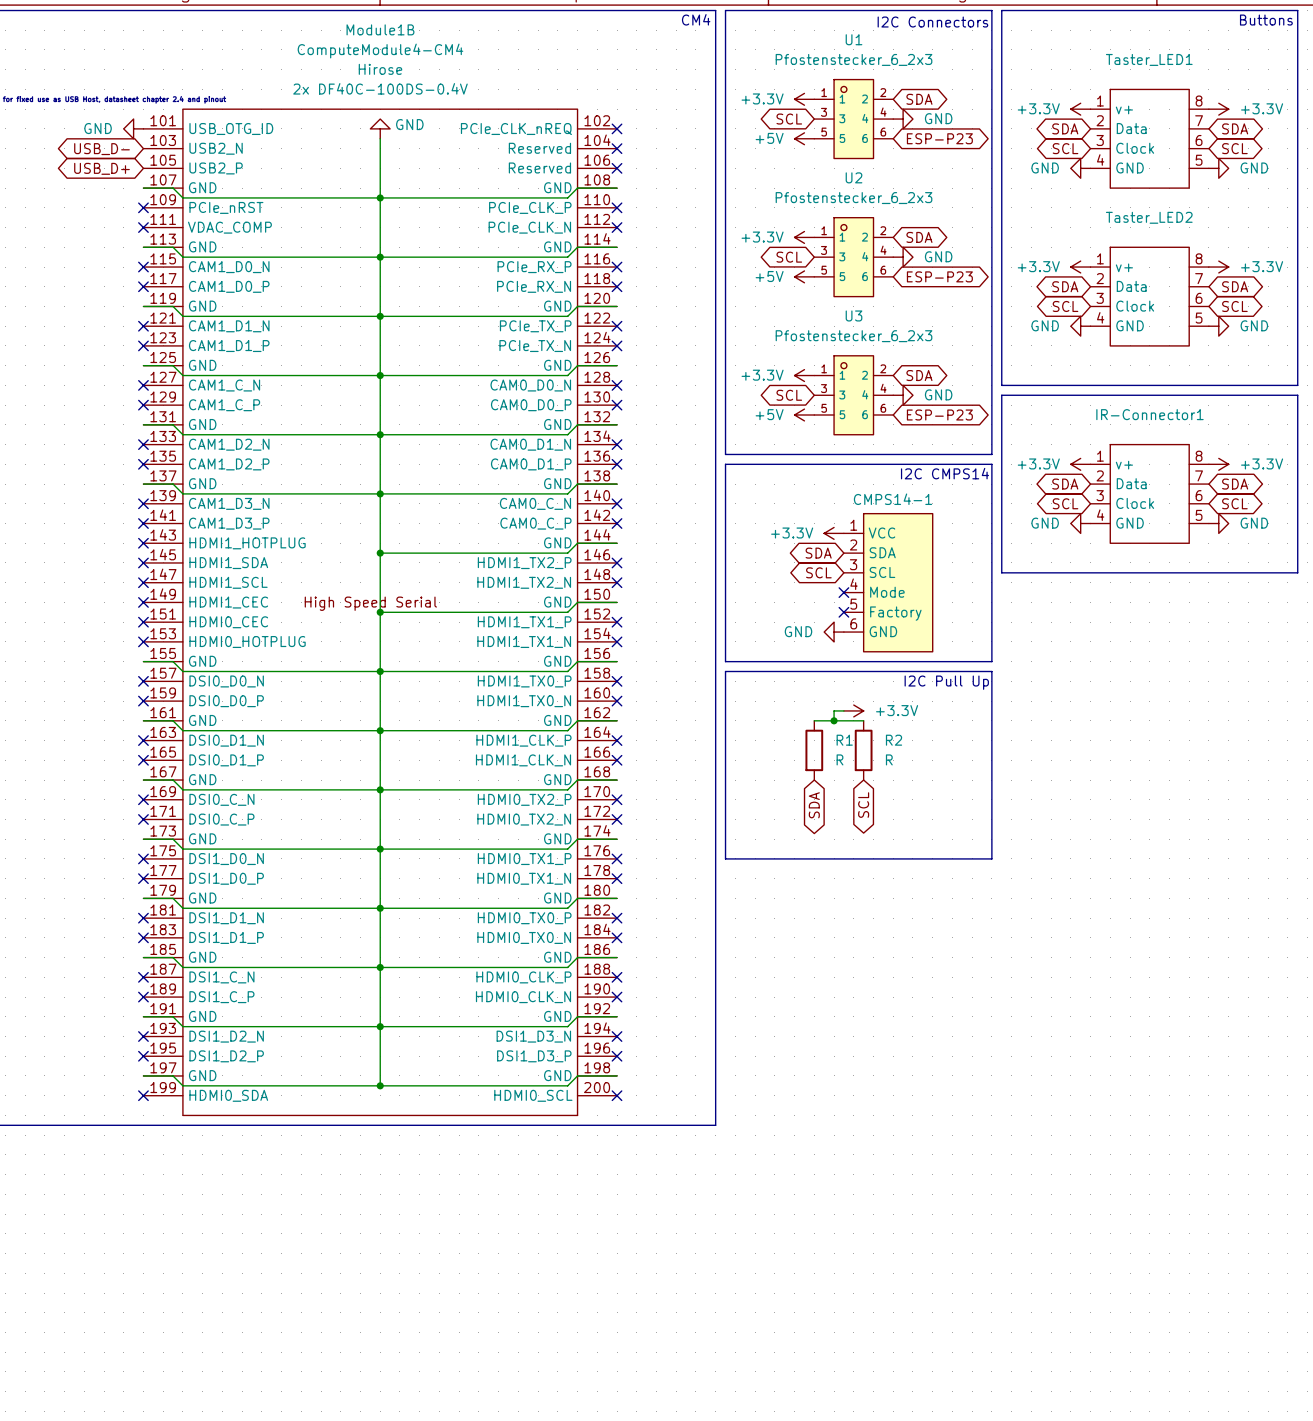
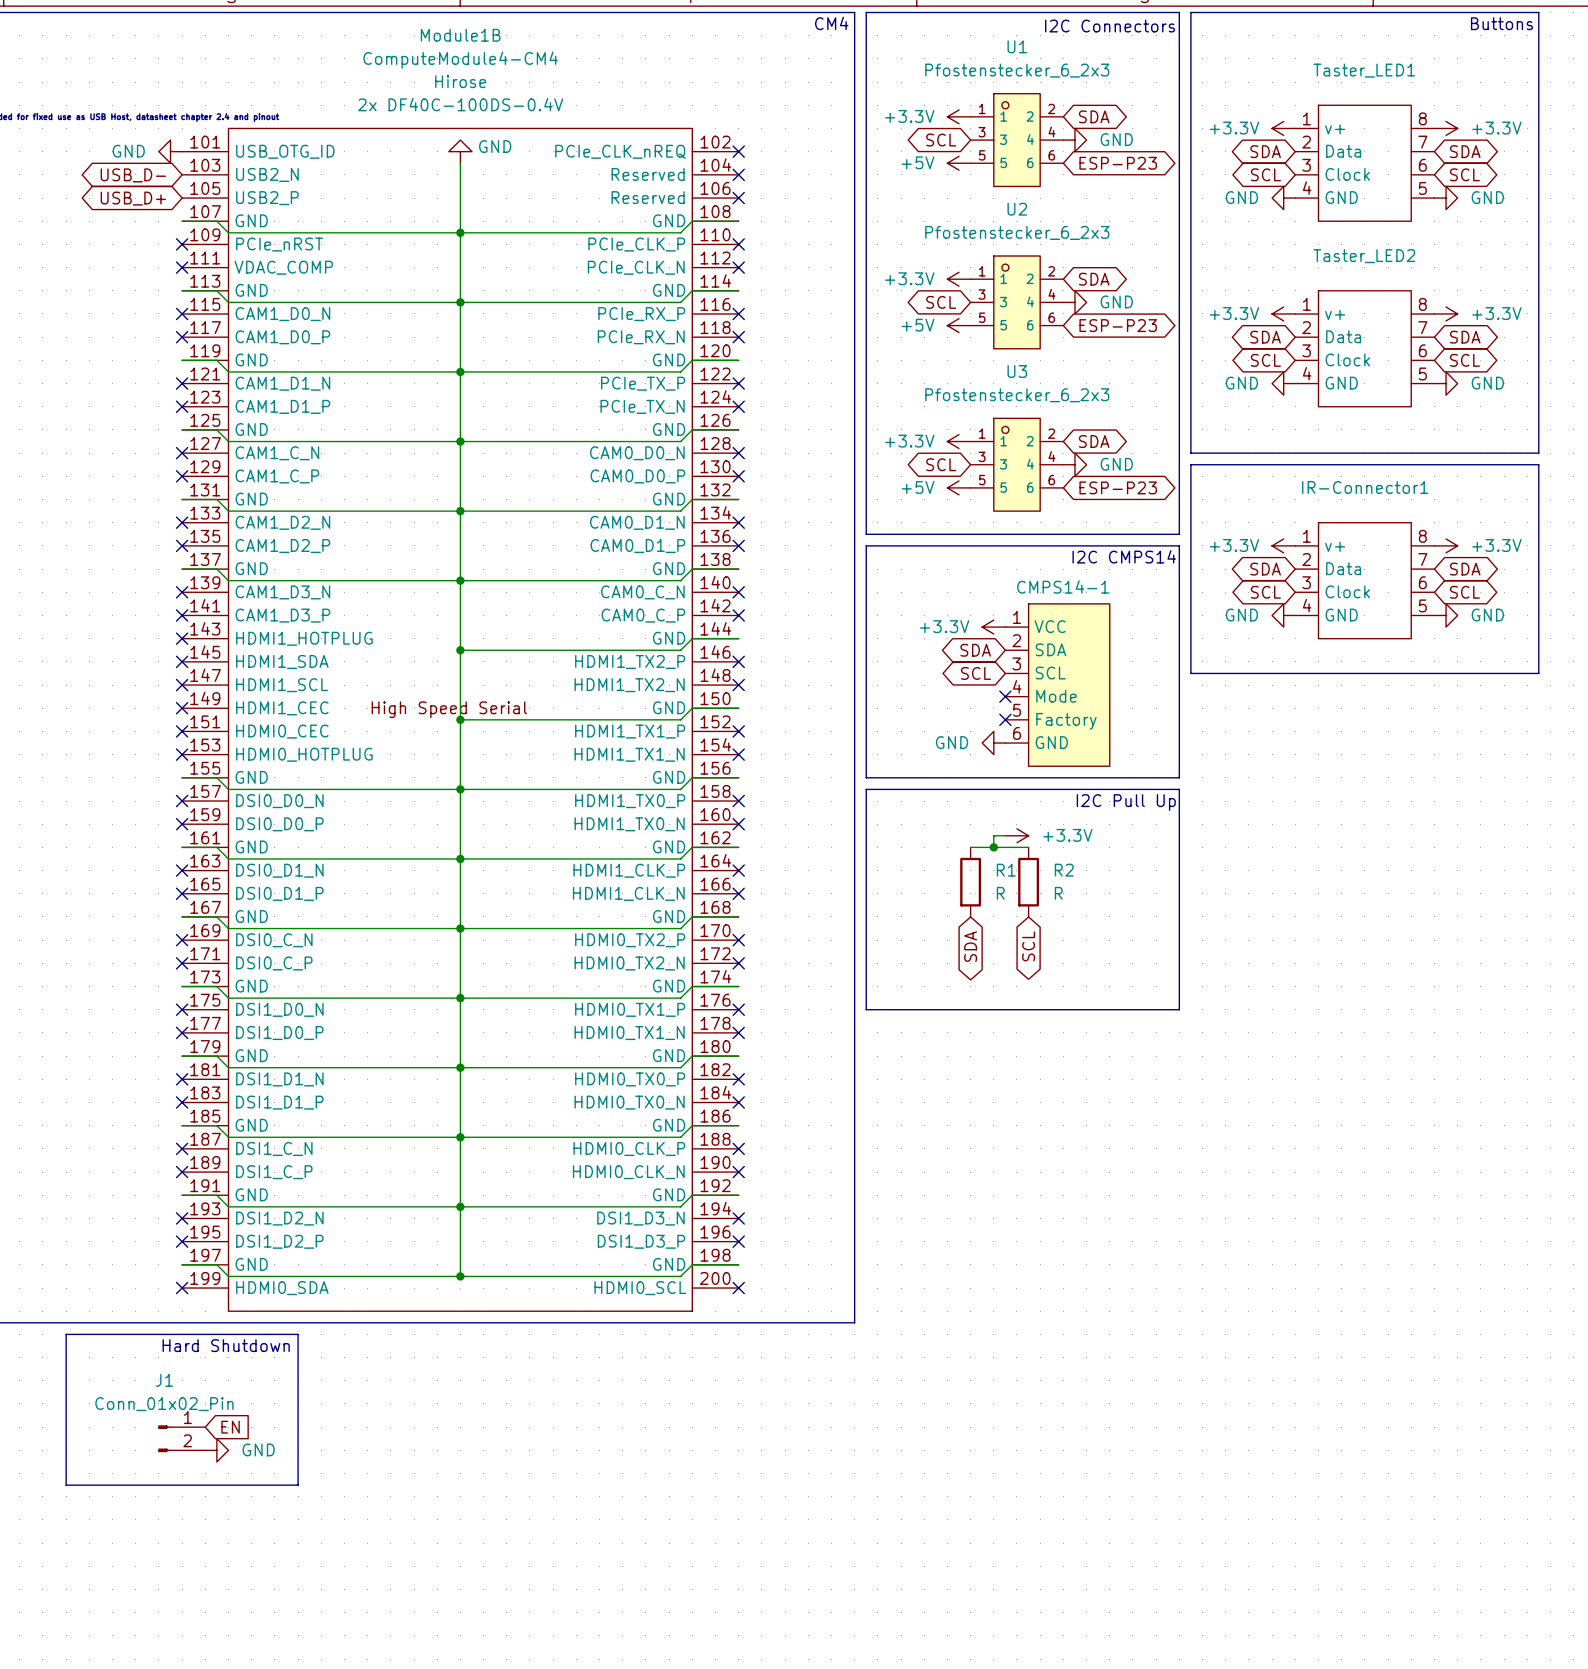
line: none -> (66, 1334) (298, 1334) (298, 1485) (66, 1485) (66, 1334)
text: none -> Hard Shutdown (226, 1345)
global label: none -> EN (230, 1427)
J1: none -> Conn_01x02_Pin (181, 1438)
power symbol: none -> GND (216, 1450)

